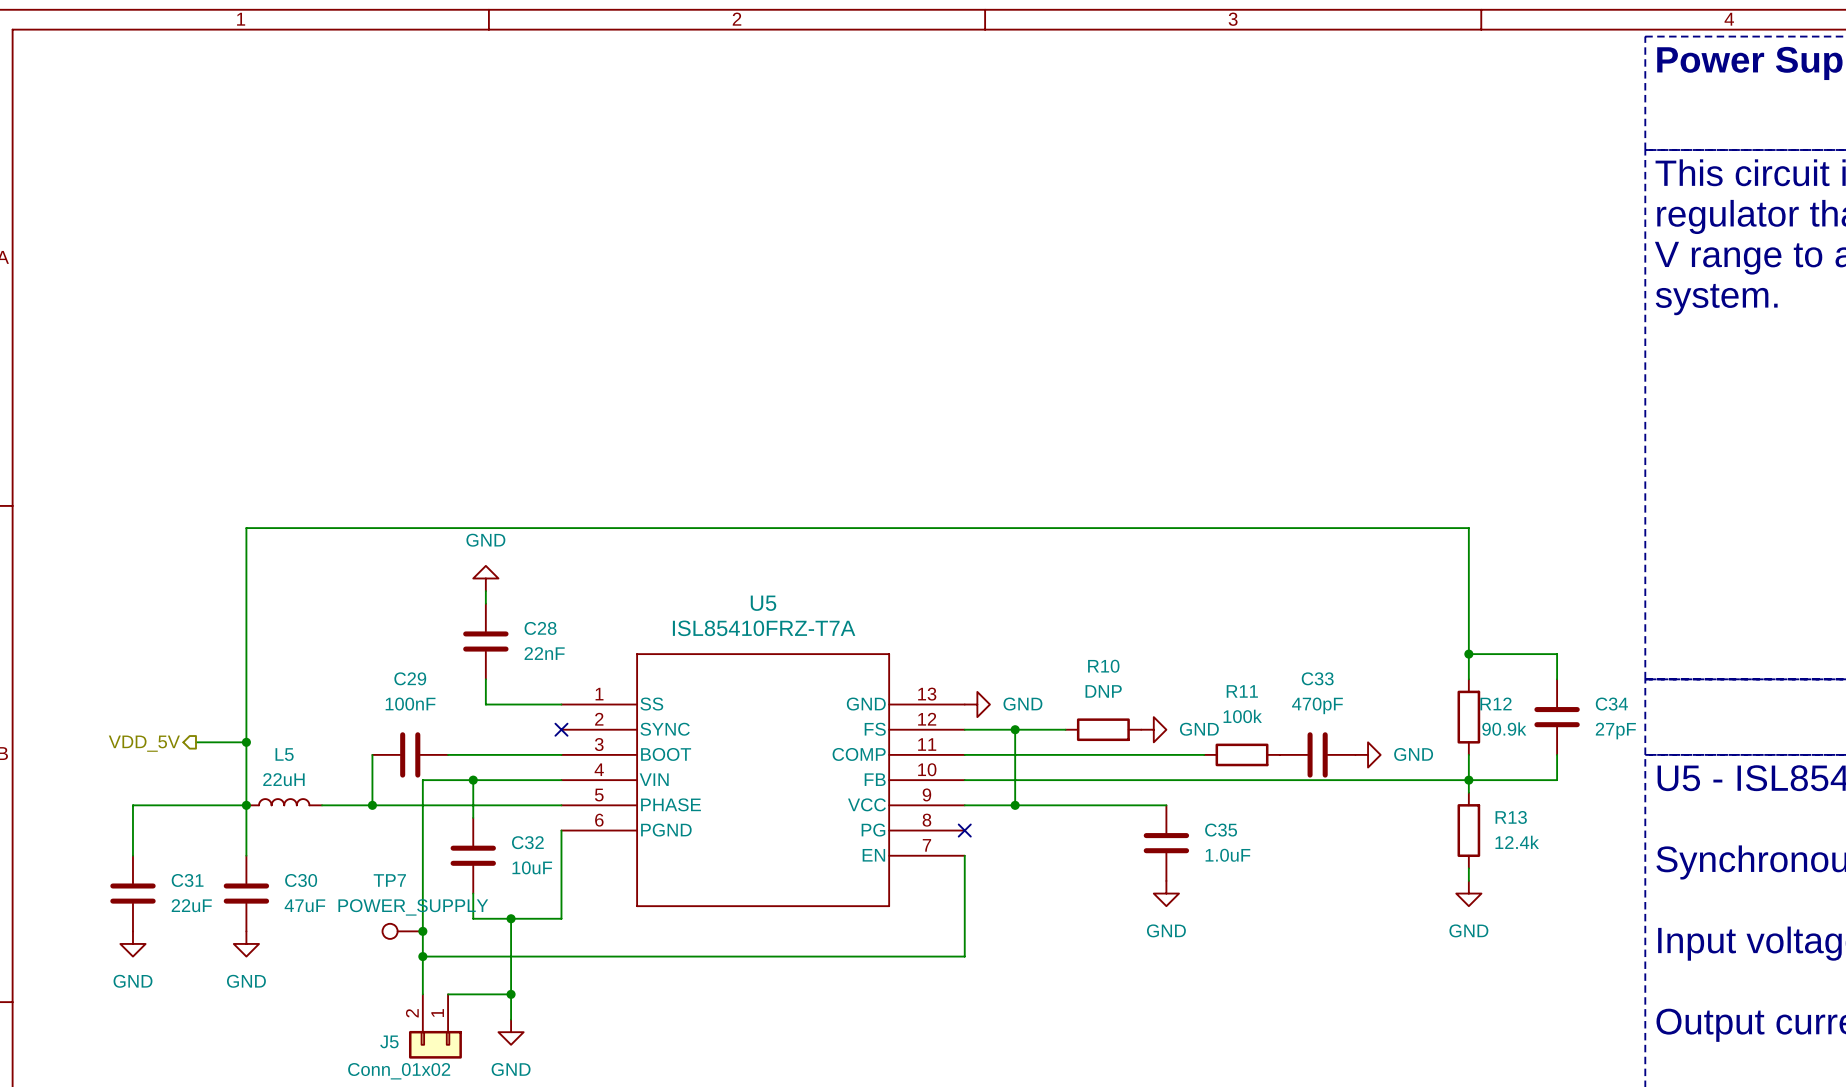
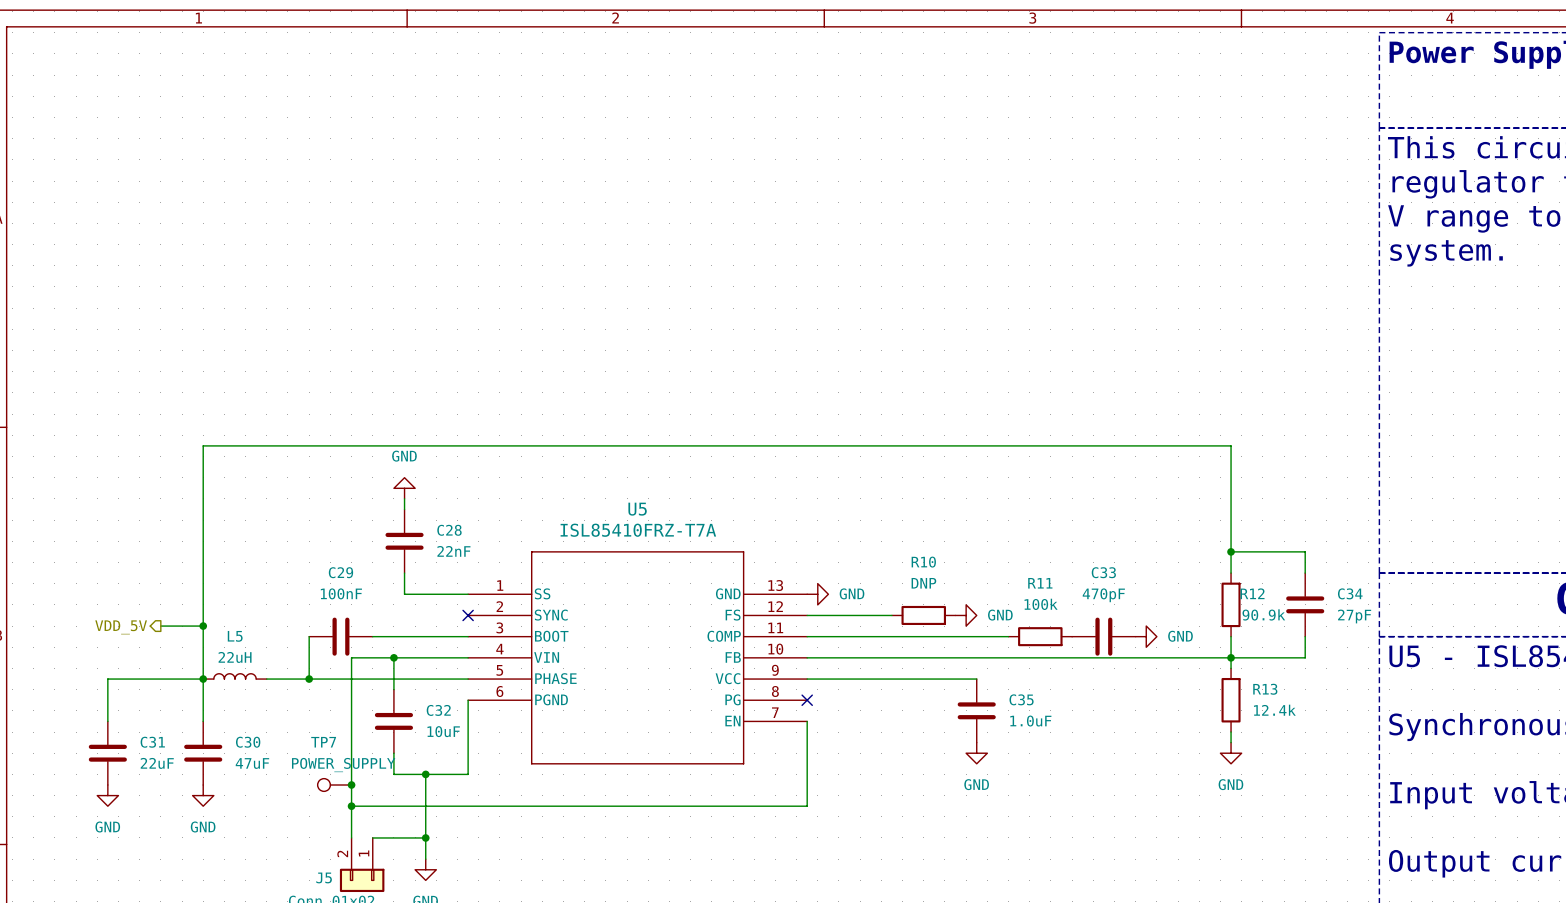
wire: (1015, 729) (1015, 805) -> none
junction: (1015, 729) -> none
junction: (1015, 805) -> none

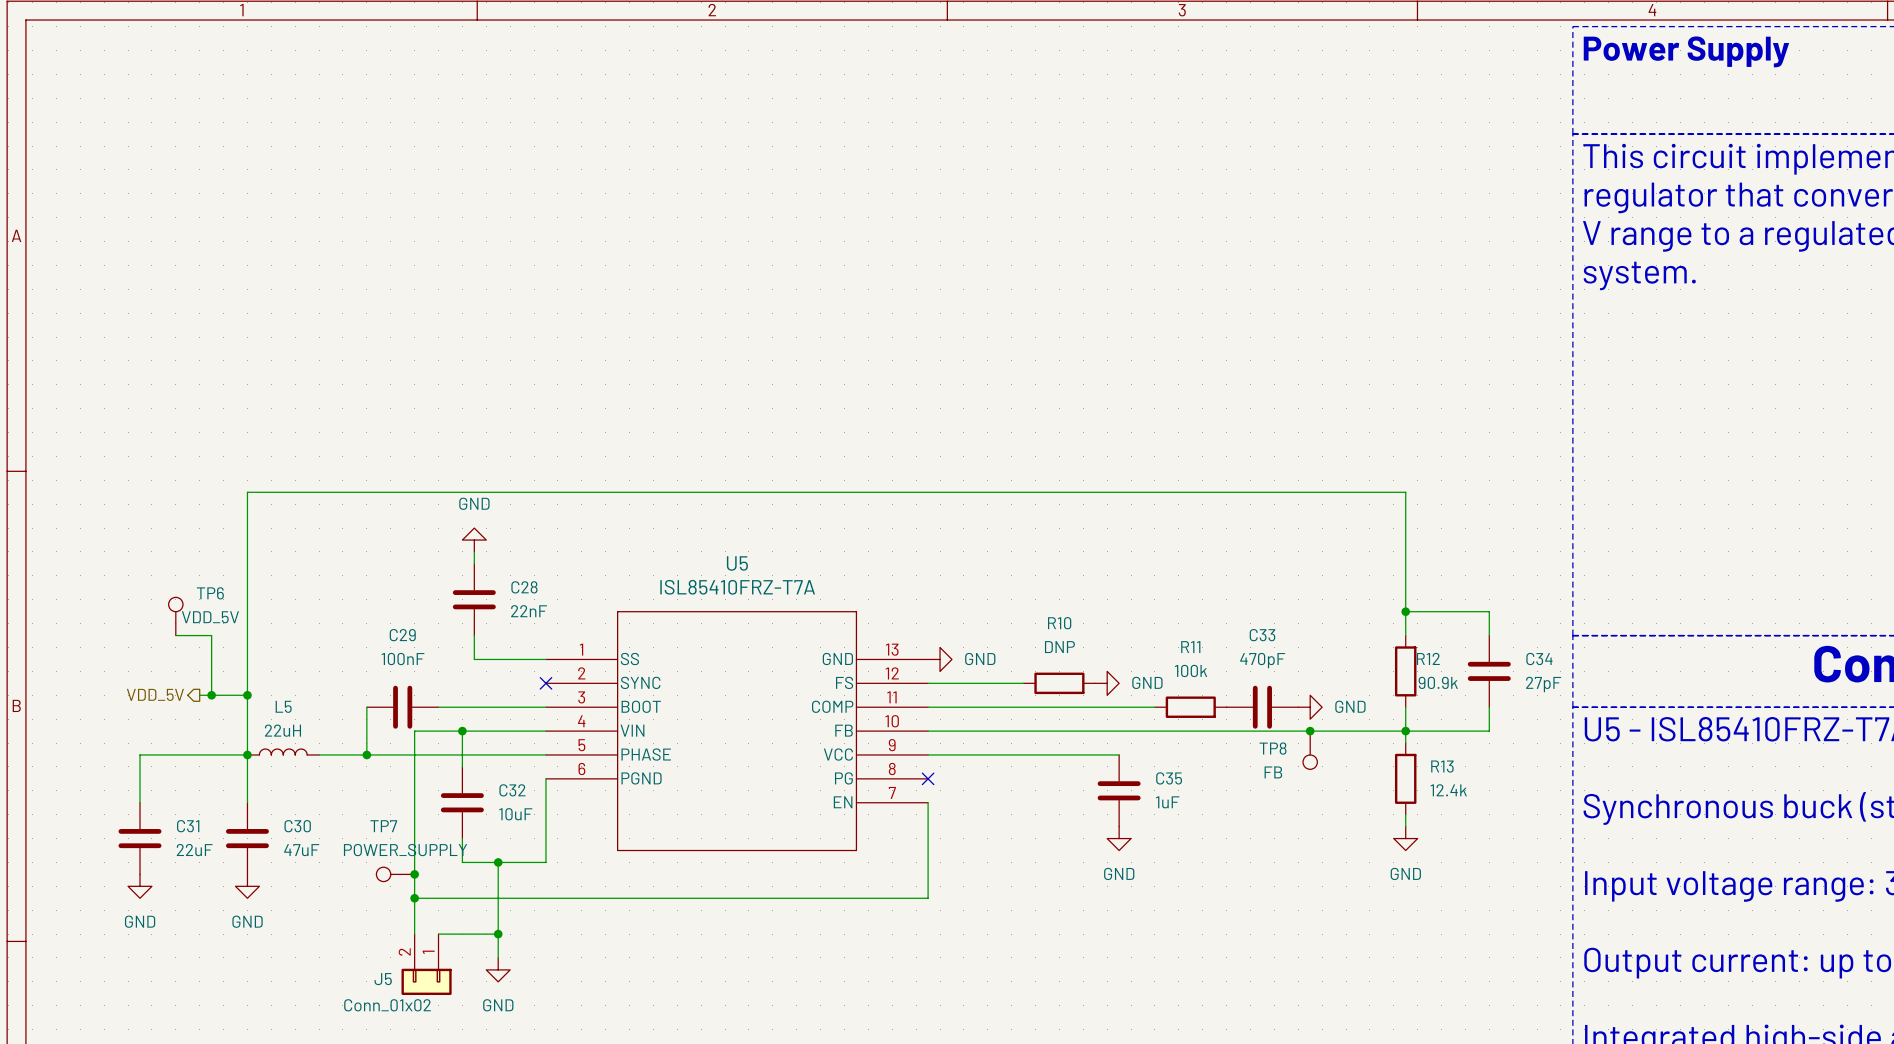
TP6: none -> VDD_5V (175, 616)
wire: none -> (175, 635) (211, 635) (211, 695)
junction: none -> (211, 695)
junction: none -> (1310, 731)
TP8: none -> FB (1310, 750)
C35 value: 1.0uF (1030, 721) -> 1uF (1167, 802)

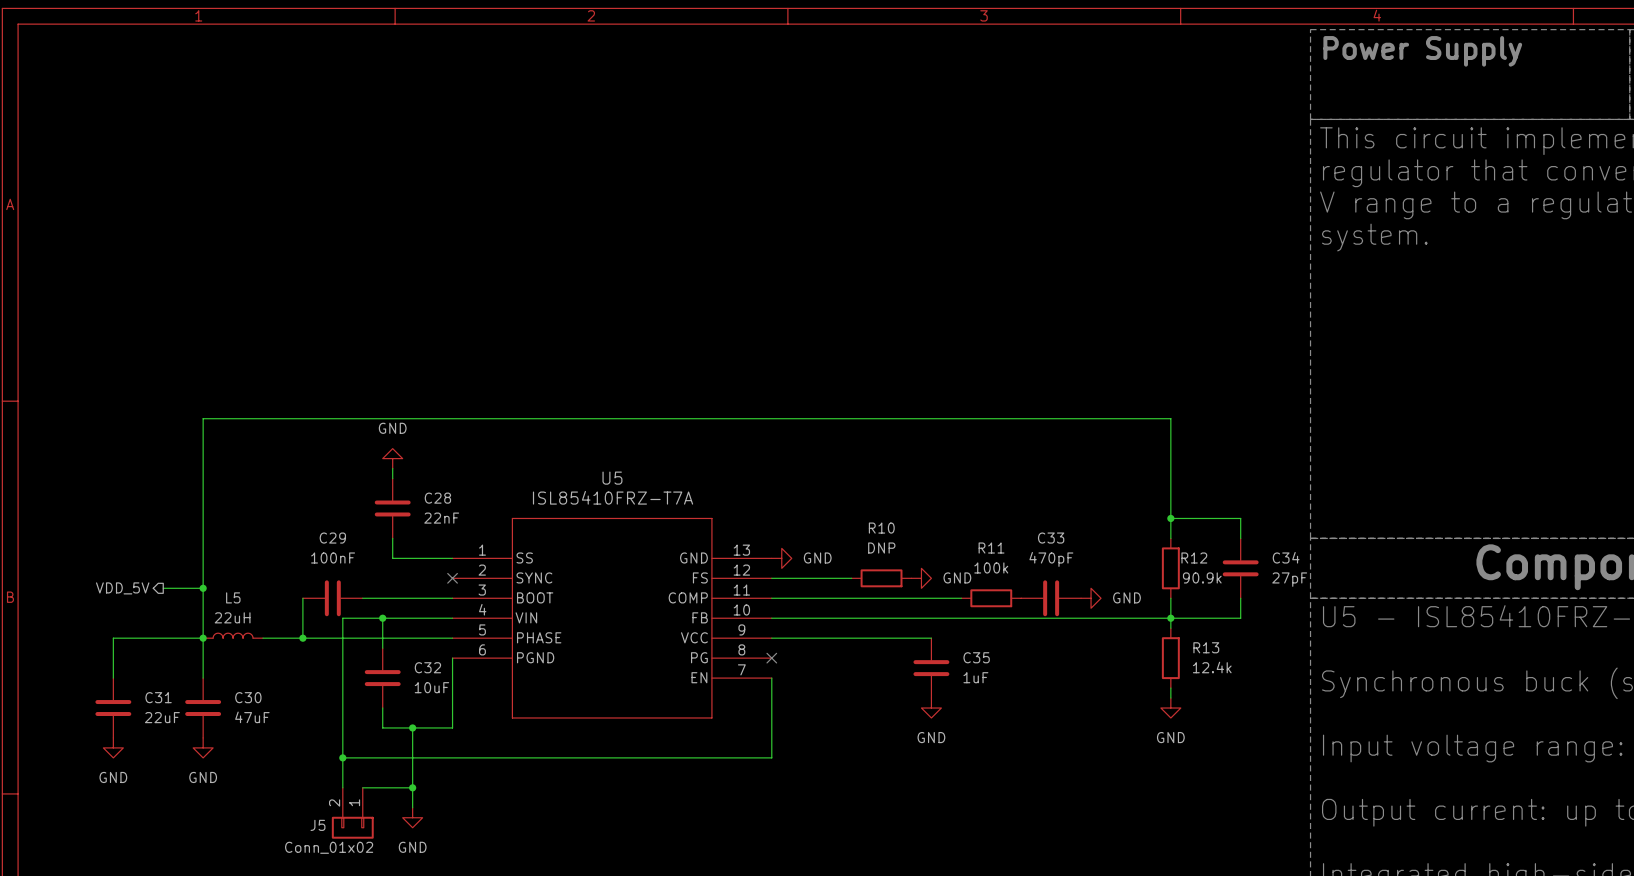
TP6: VDD_5V (175, 616) -> none
wire: (175, 635) (211, 635) (211, 695) -> none
junction: (211, 695) -> none
junction: (1310, 731) -> none
TP8: FB (1310, 750) -> none
TP7: POWER_SUPPLY (395, 874) -> none
junction: (414, 874) -> none

